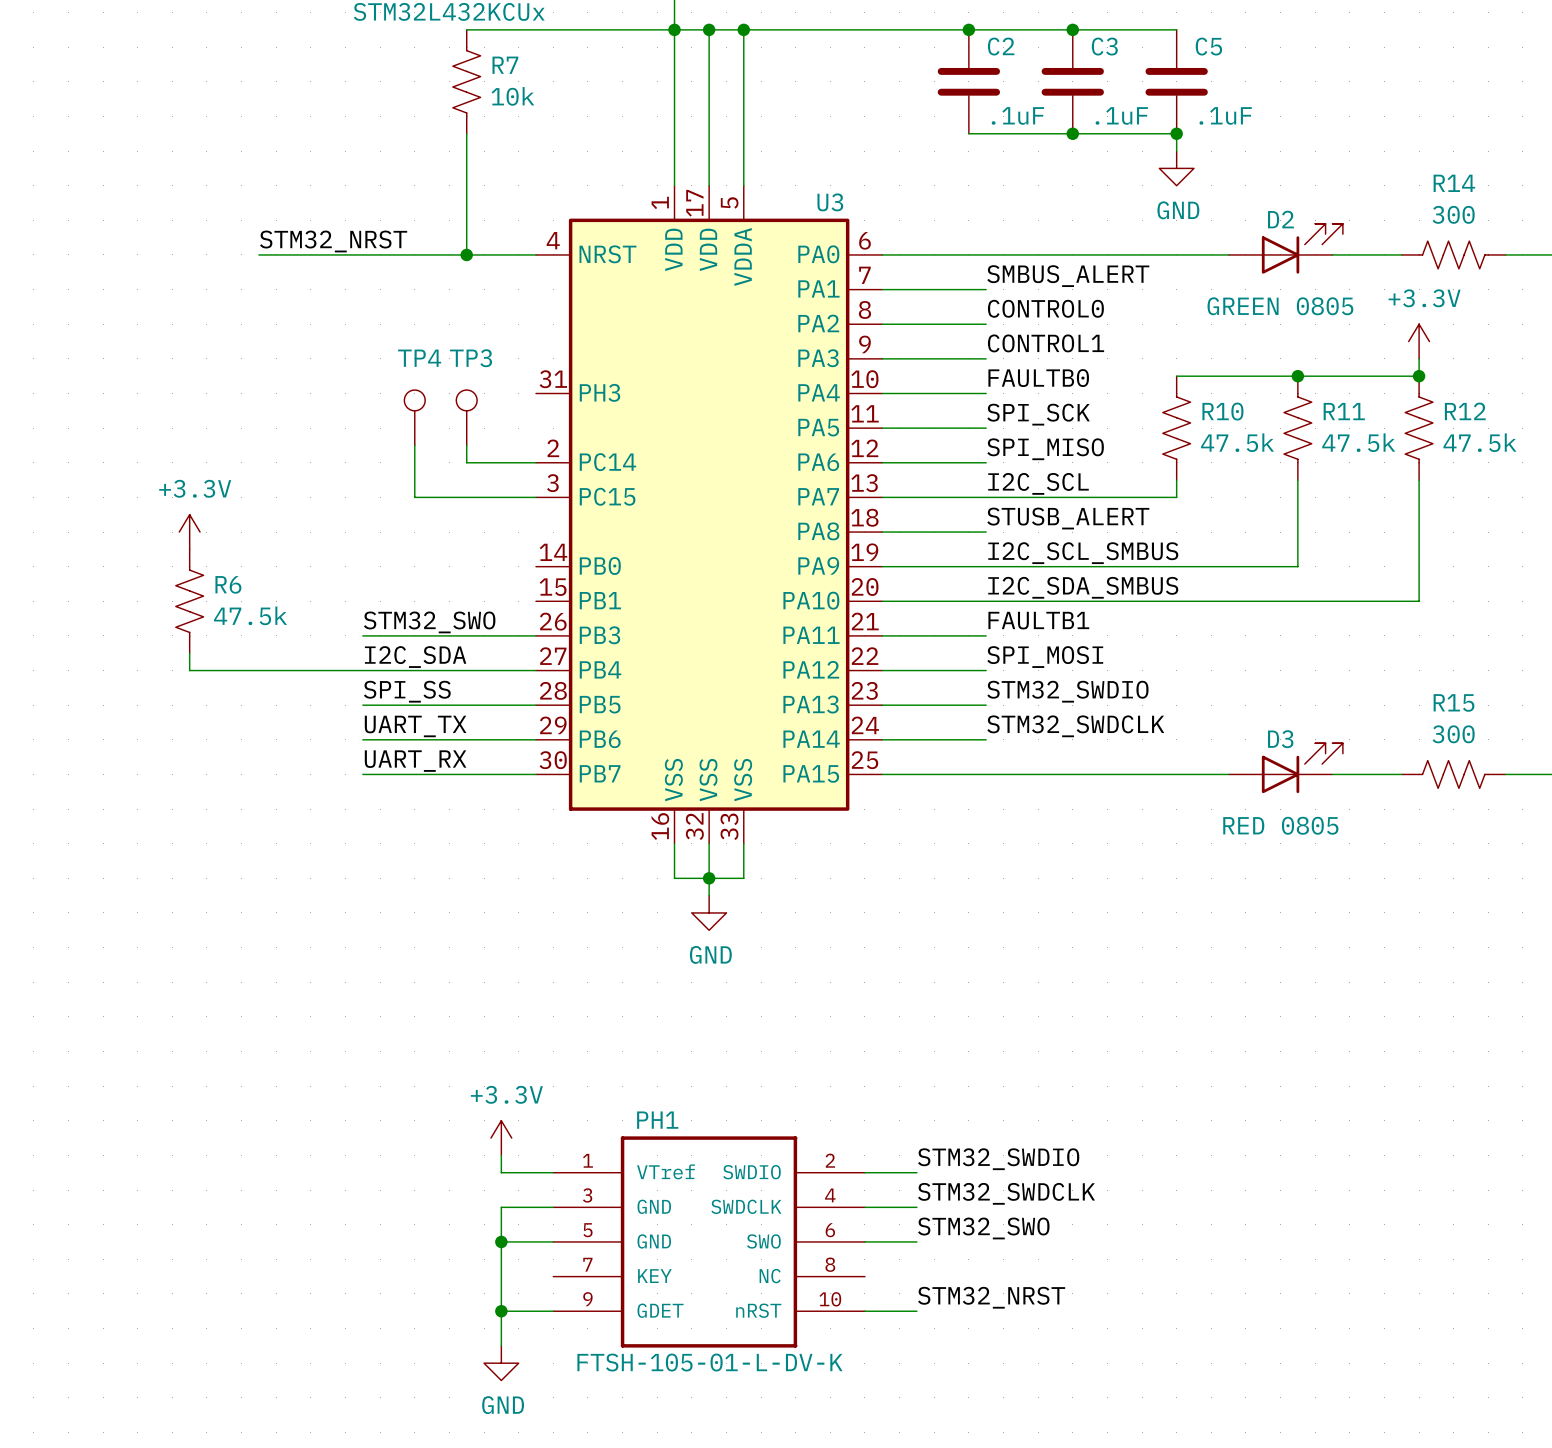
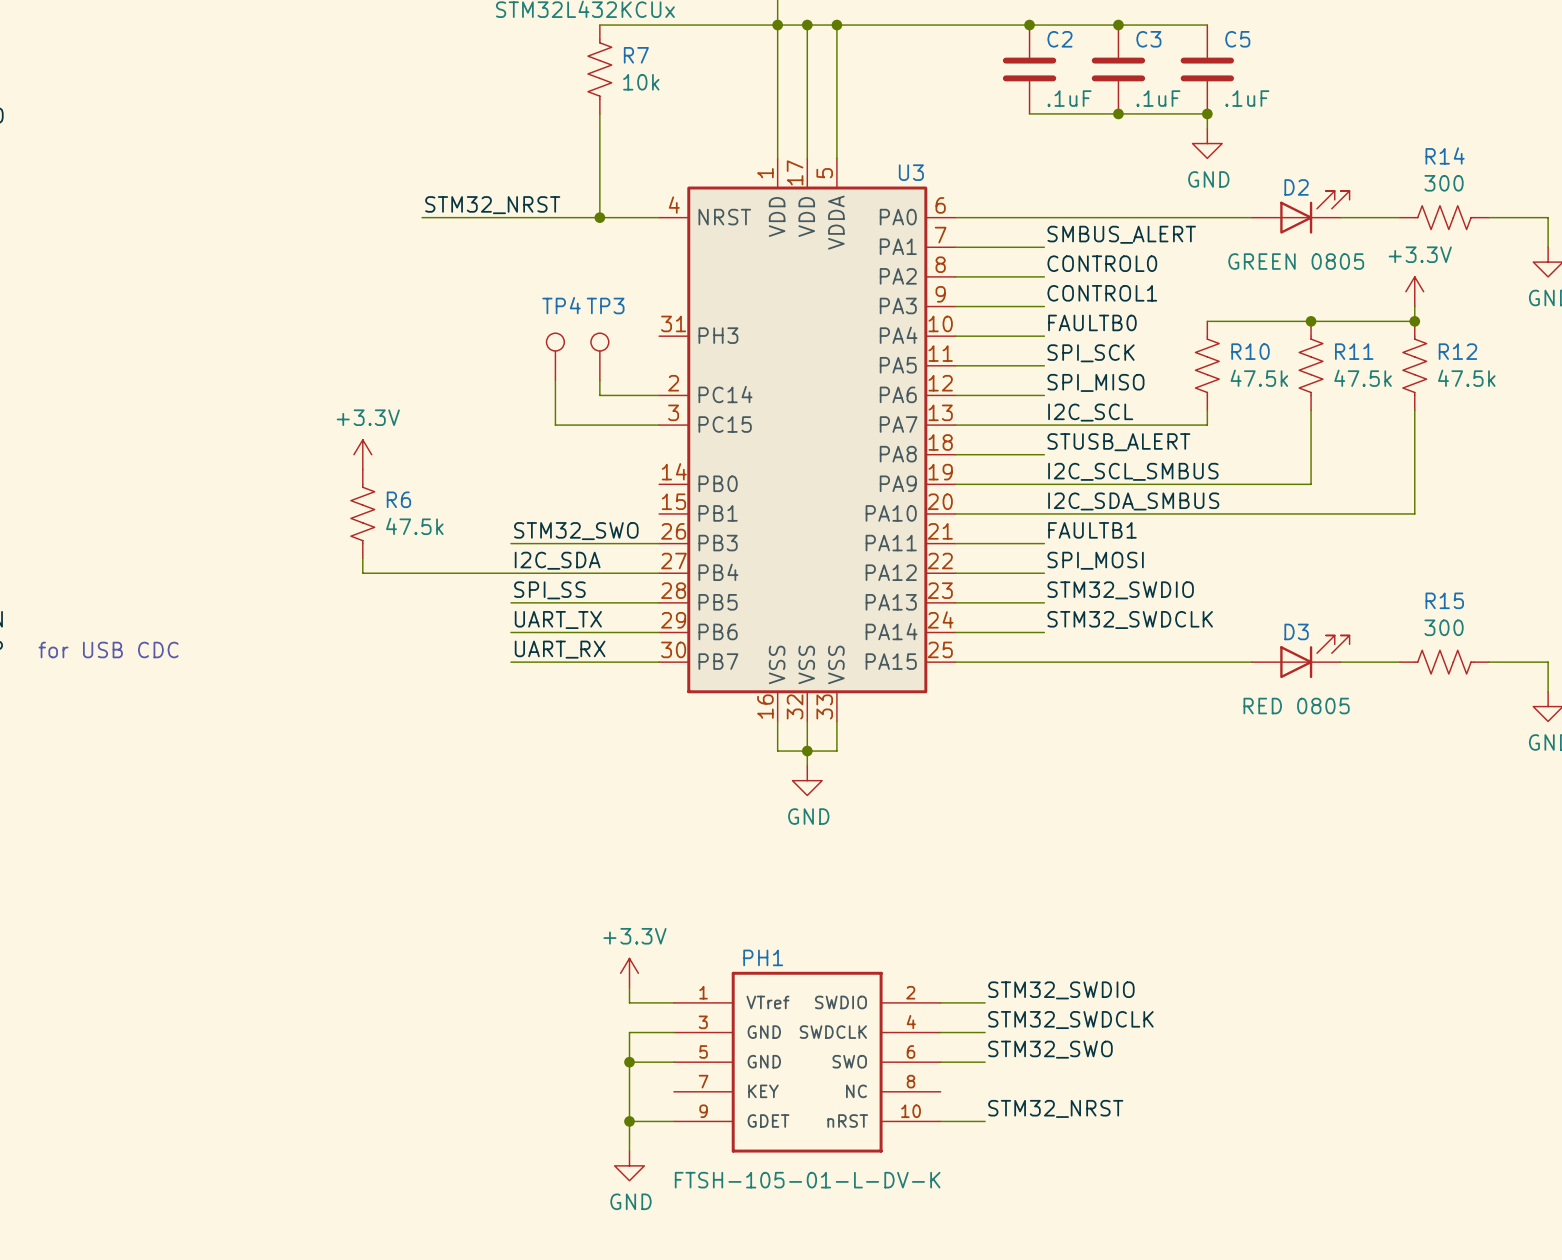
PH1 value position: FTSH-105-01-L-DV-K (709, 1362) -> FTSH-105-01-L-DV-K (807, 1180)

